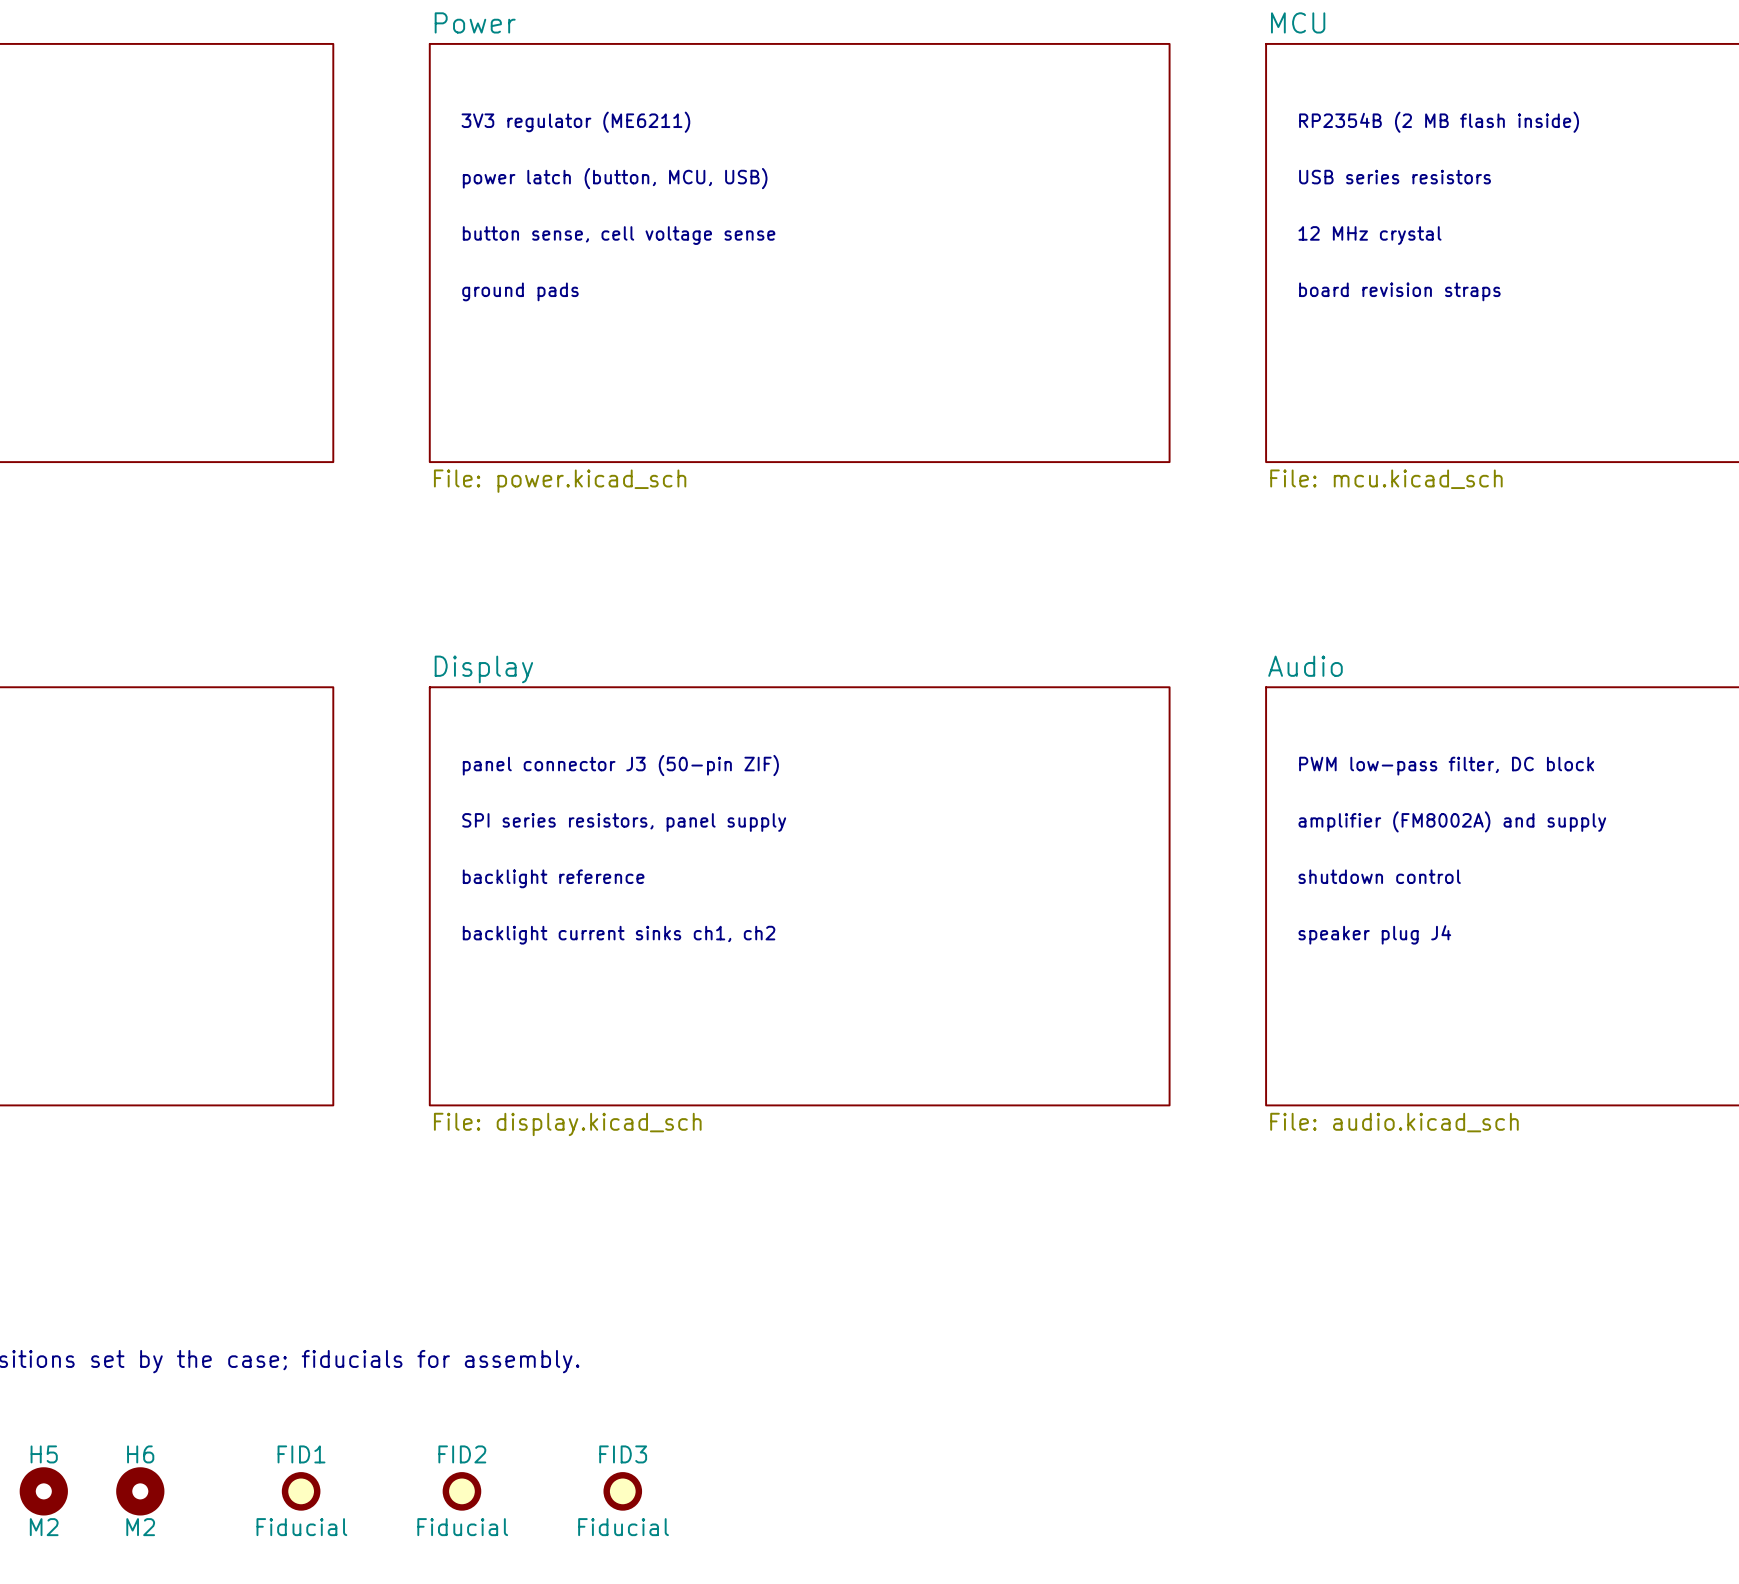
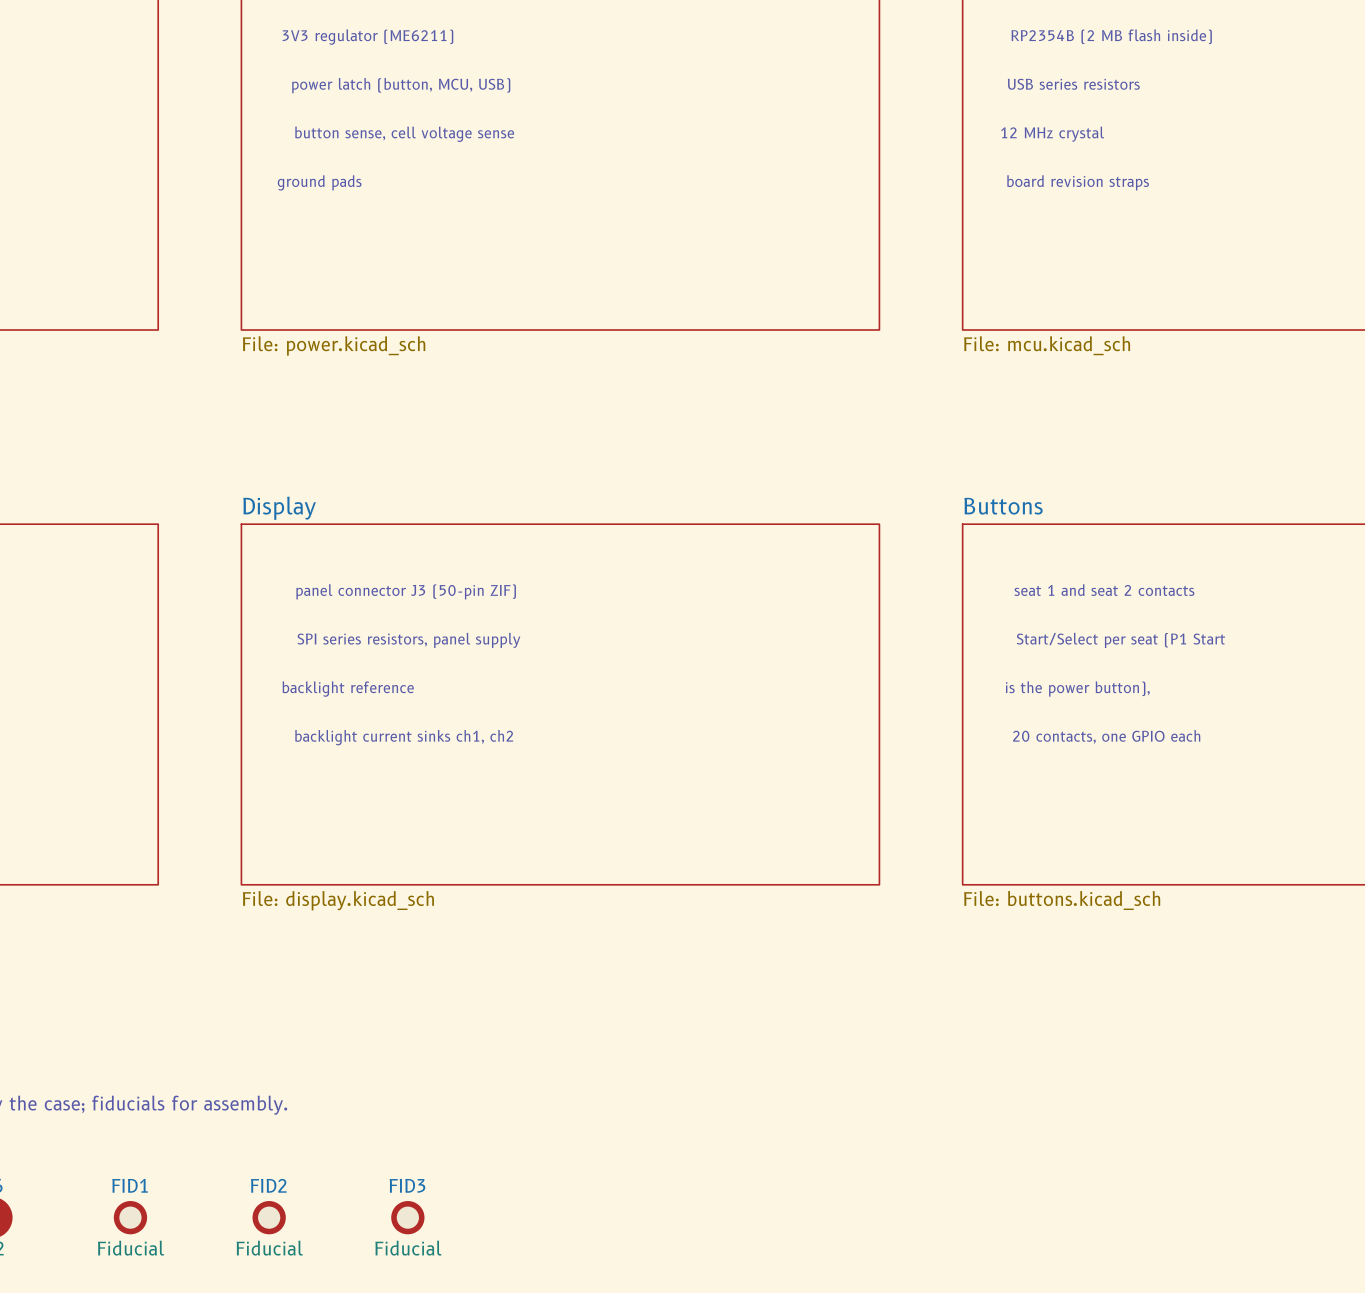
sheet Audio name: Audio (1305, 666) -> Buttons (1003, 506)
text: none -> seat 1 and seat 2 contacts (1104, 590)
text: PWM low-pass filter, DC block (1446, 766) -> none
text: amplifier (FM8002A) and supply (1452, 821) -> Start/Select per seat (P1 Start (1120, 640)
text: shutdown control (1379, 876) -> none
text: none -> is the power button), (1077, 689)
text: none -> 20 contacts, one GPIO each (1106, 736)
text: speaker plug J4 (1374, 934) -> none
sheet Audio value: File: audio.kicad_sch (1394, 1122) -> File: buttons.kicad_sch (1062, 900)

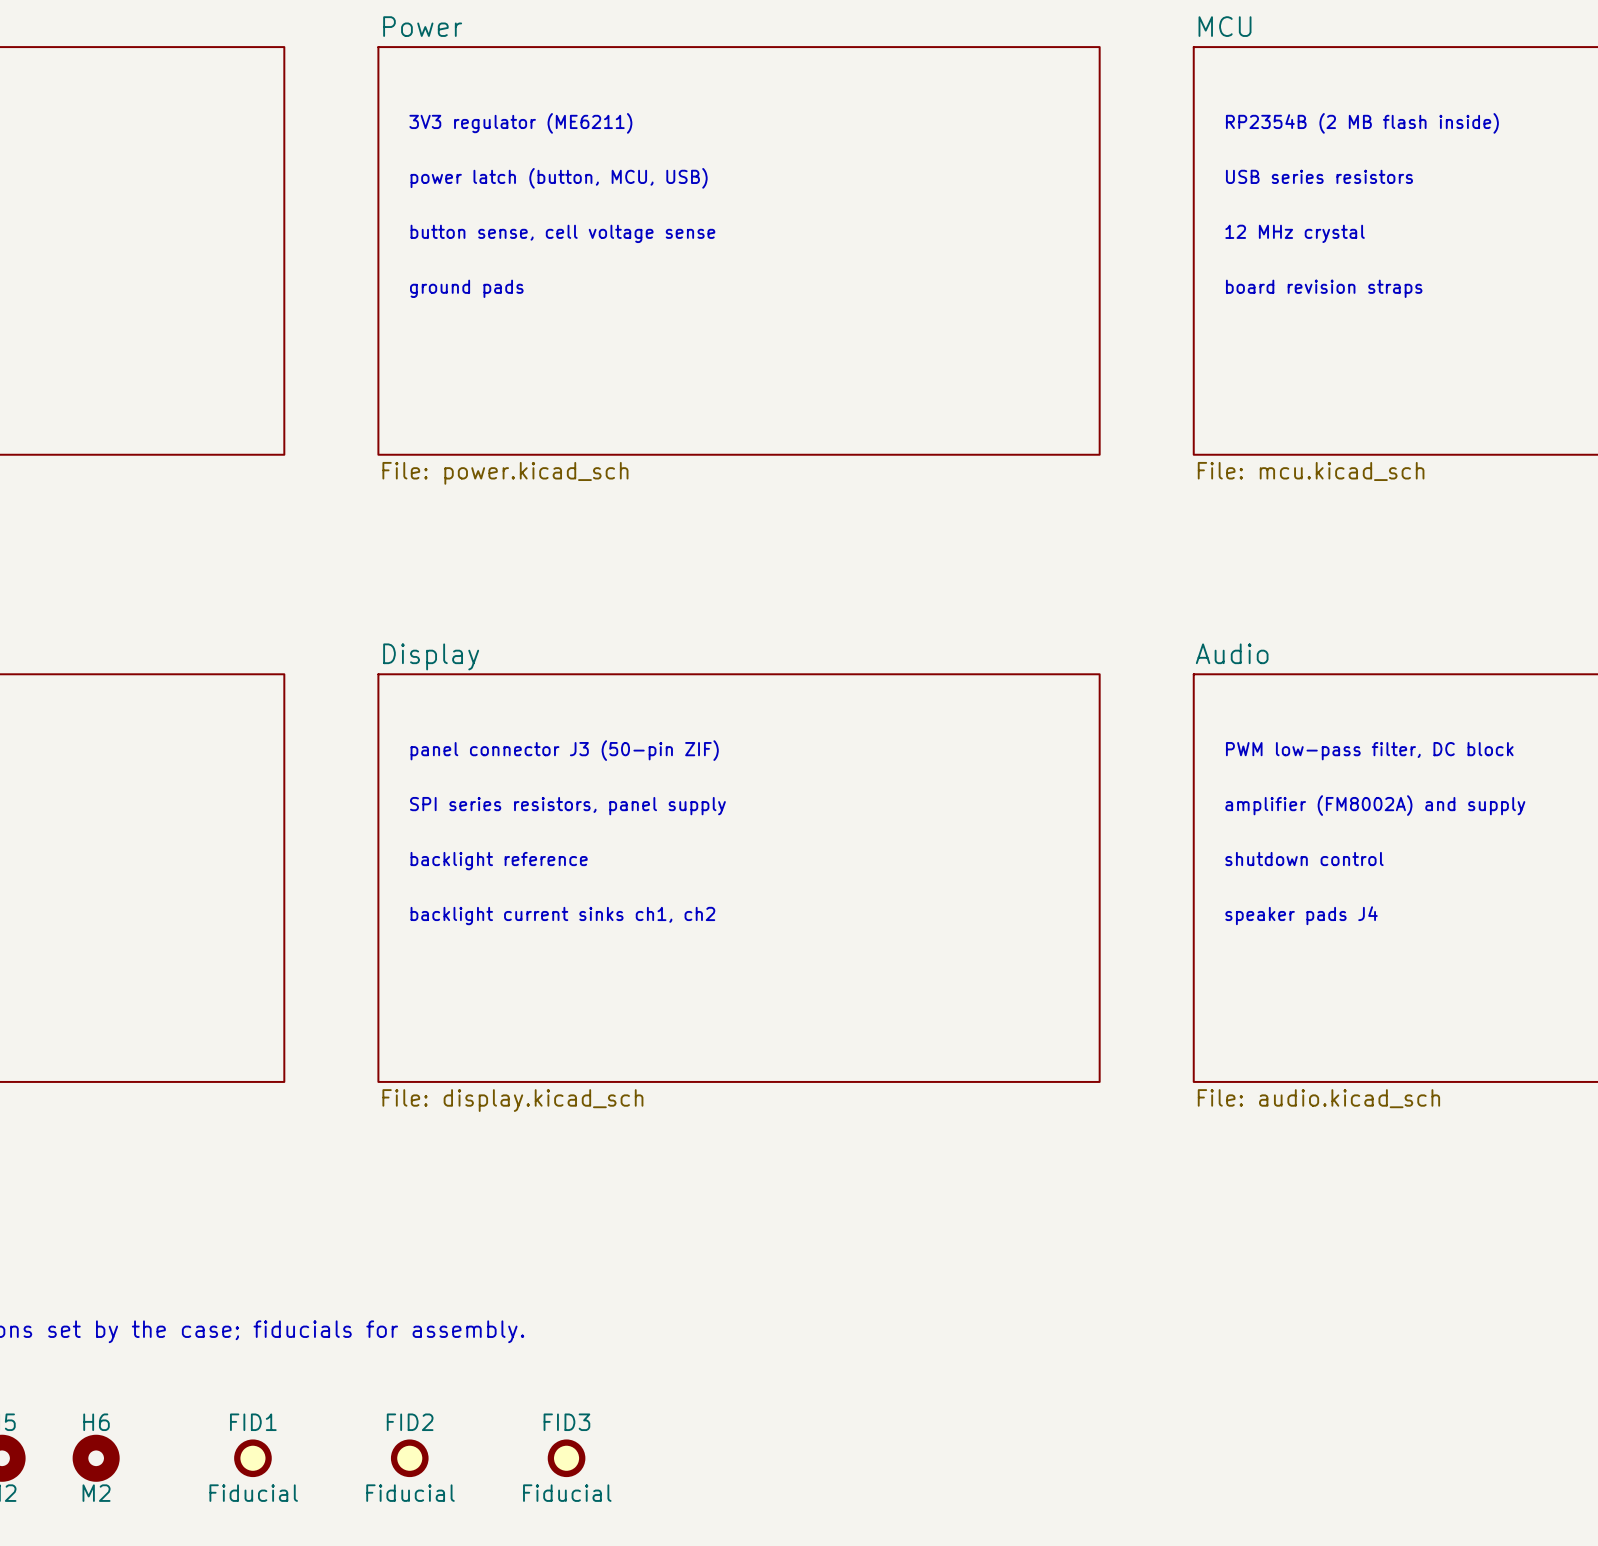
sheet Buttons name: Buttons (1003, 506) -> Audio (1232, 653)
text: seat 1 and seat 2 contacts (1104, 590) -> none
text: none -> PWM low-pass filter, DC block (1369, 751)
text: Start/Select per seat (P1 Start (1120, 640) -> amplifier (FM8002A) and supply (1375, 805)
text: none -> shutdown control (1304, 859)
text: is the power button), (1077, 689) -> none
text: 20 contacts, one GPIO each (1106, 736) -> none
text: none -> speaker pads J4 (1301, 915)
sheet Buttons value: File: buttons.kicad_sch (1062, 900) -> File: audio.kicad_sch (1318, 1098)

